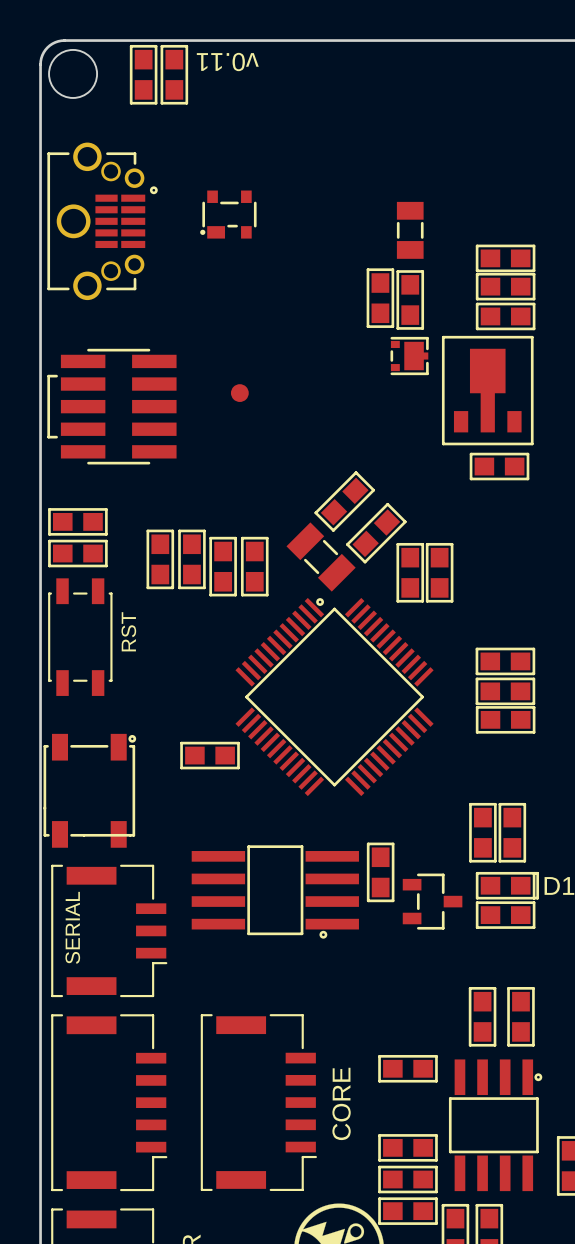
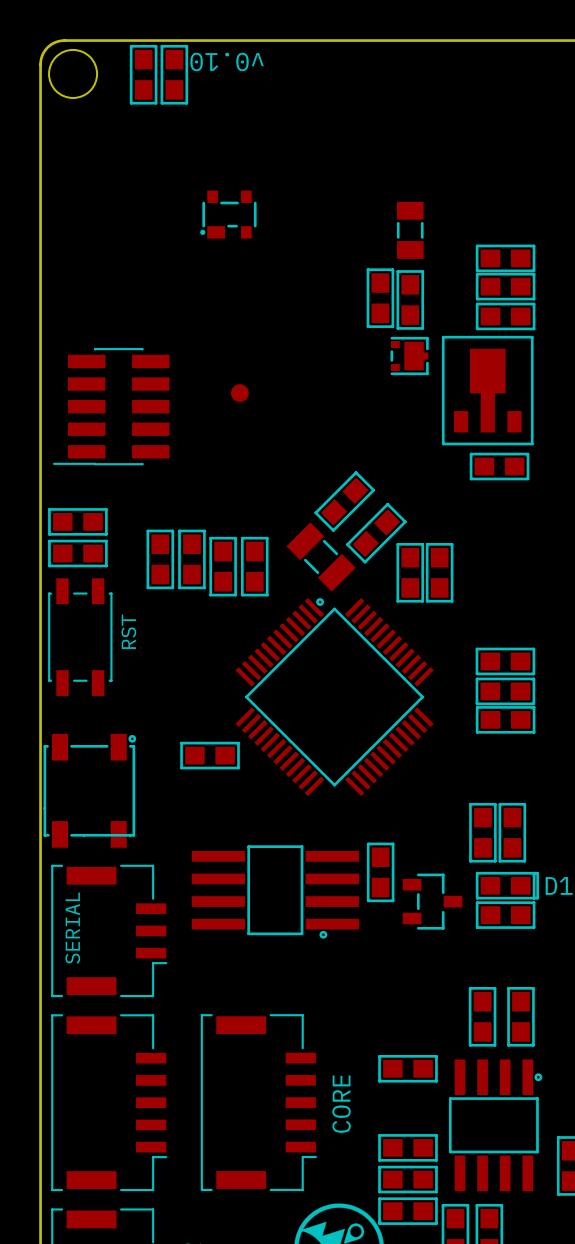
text: v0.11 (227, 62) -> v0.10 (227, 61)
part: (102, 221) -> none
part footprint: [47, 348, 177, 465] -> [52, 348, 170, 466]

